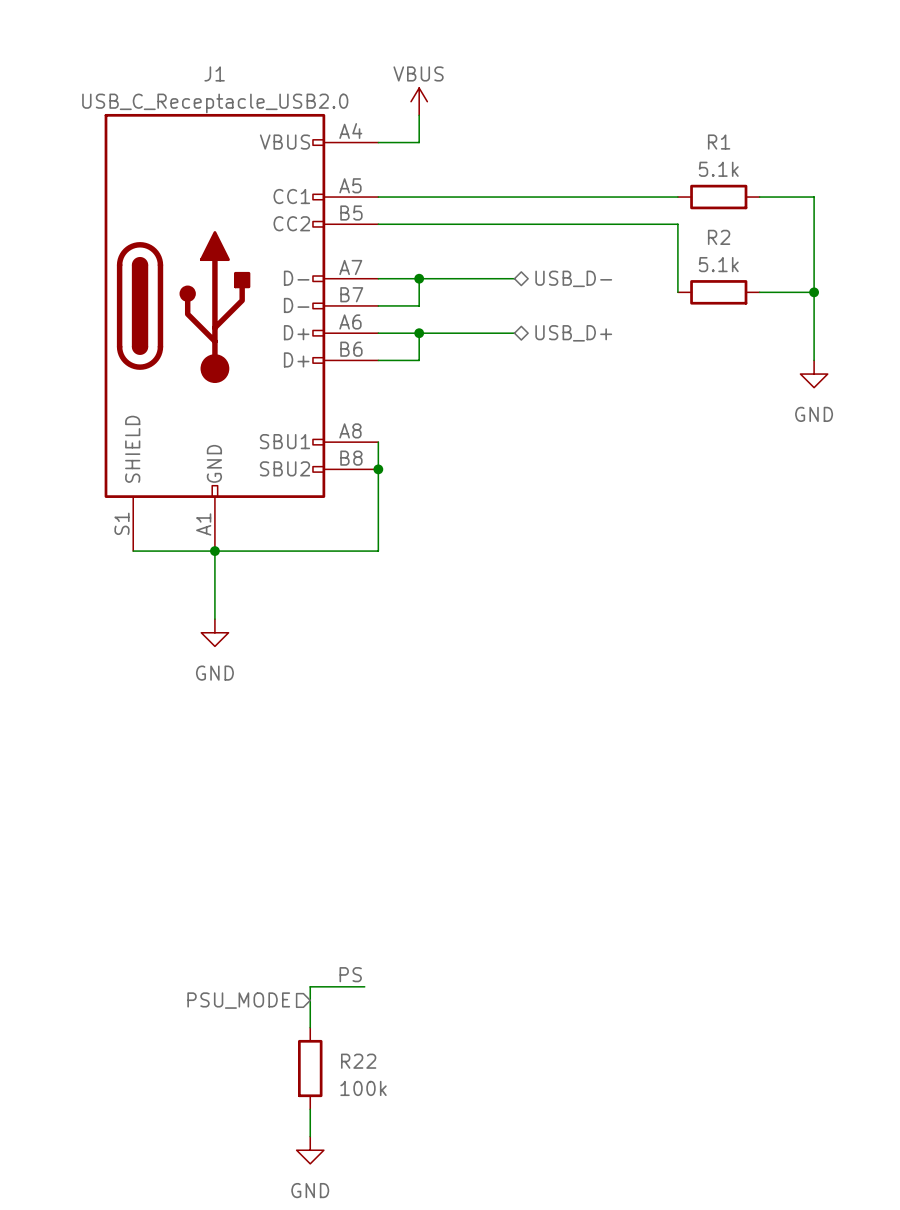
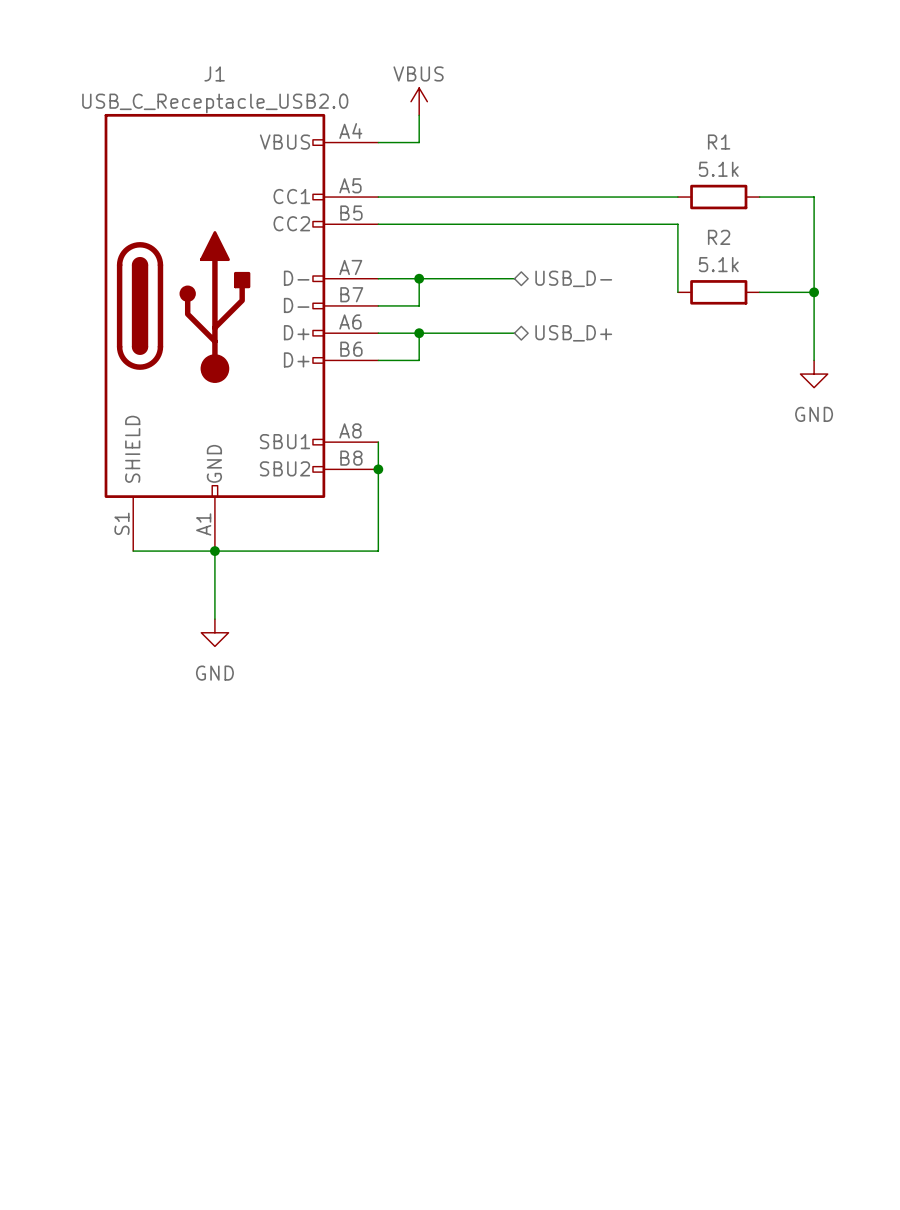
label: PS (350, 974) -> none
wire: (364, 986) (310, 986) (310, 1027) -> none
hierarchical label: PSU_MODE (238, 1000) -> none
R22: 100k (310, 1068) -> none
wire: (310, 1109) (310, 1136) -> none
power symbol: GND (310, 1150) -> none

